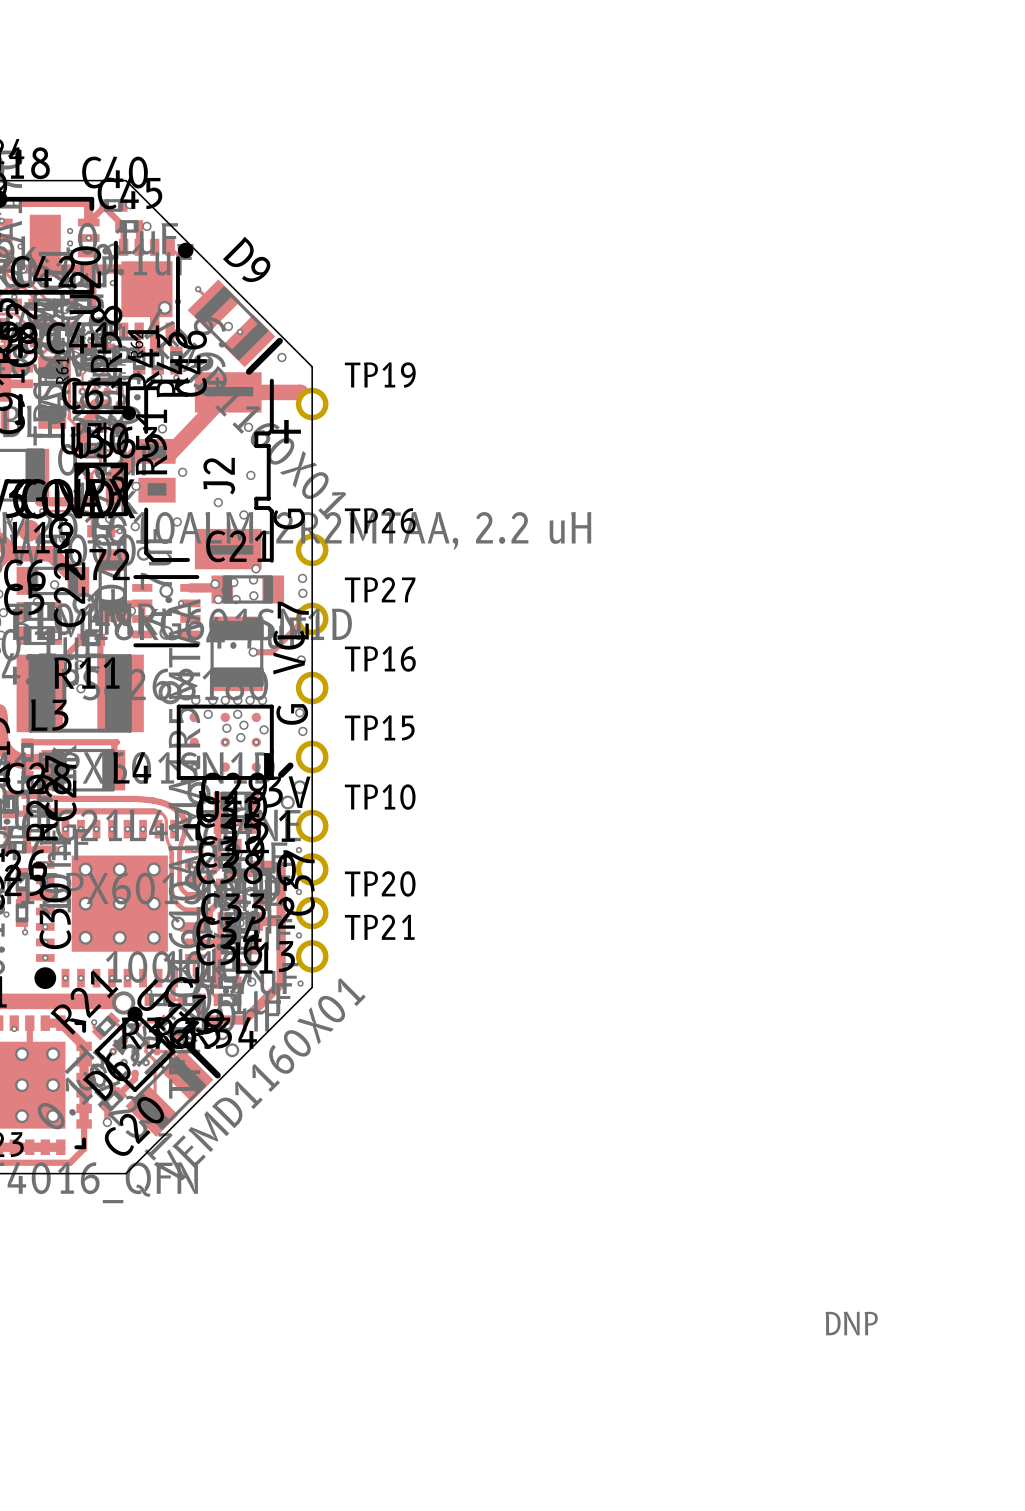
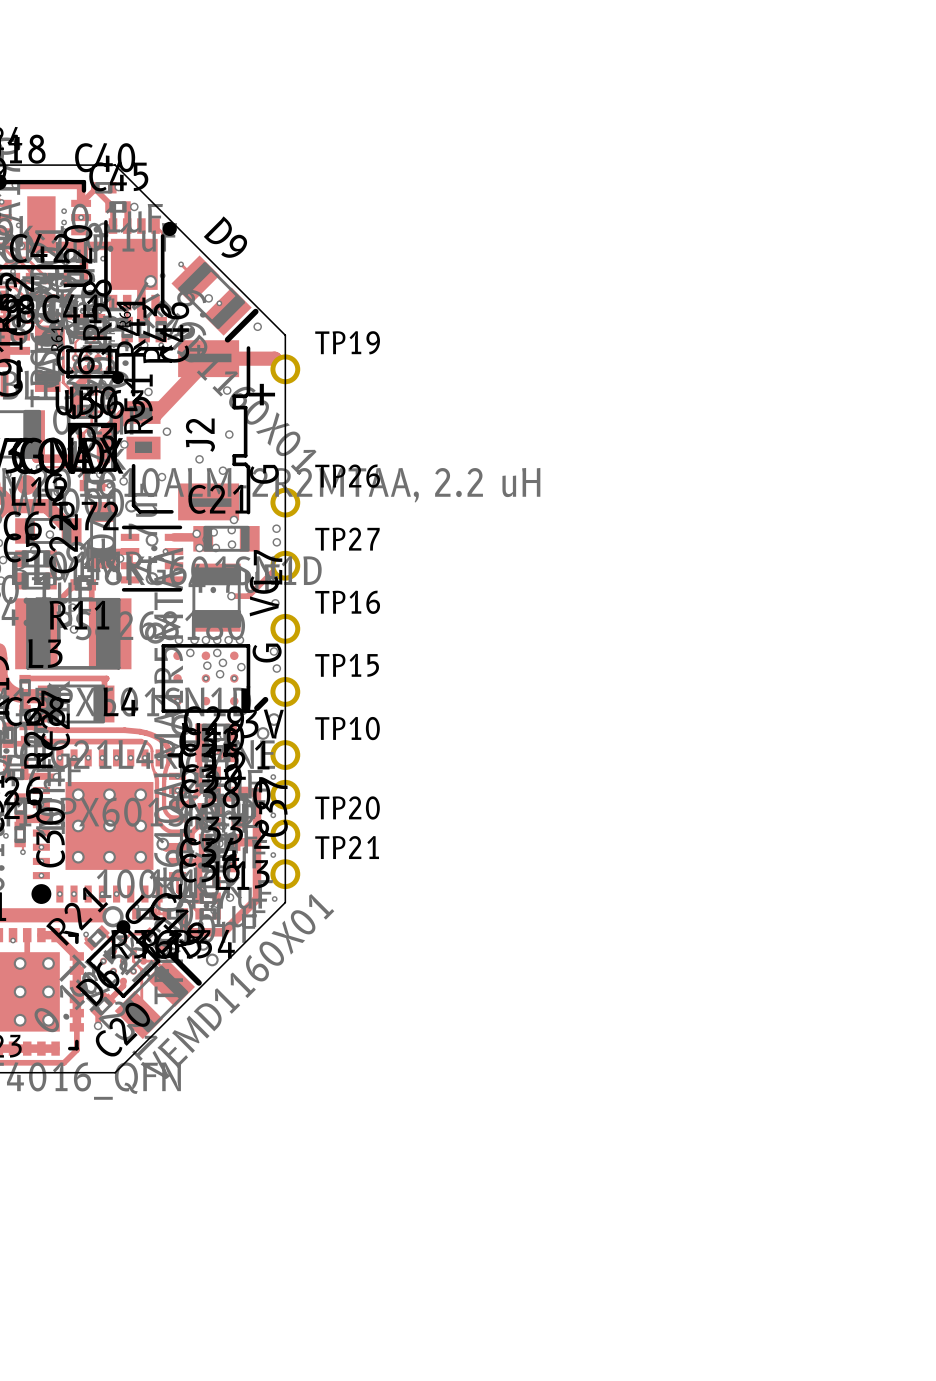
text: DNP (851, 1323) -> none

